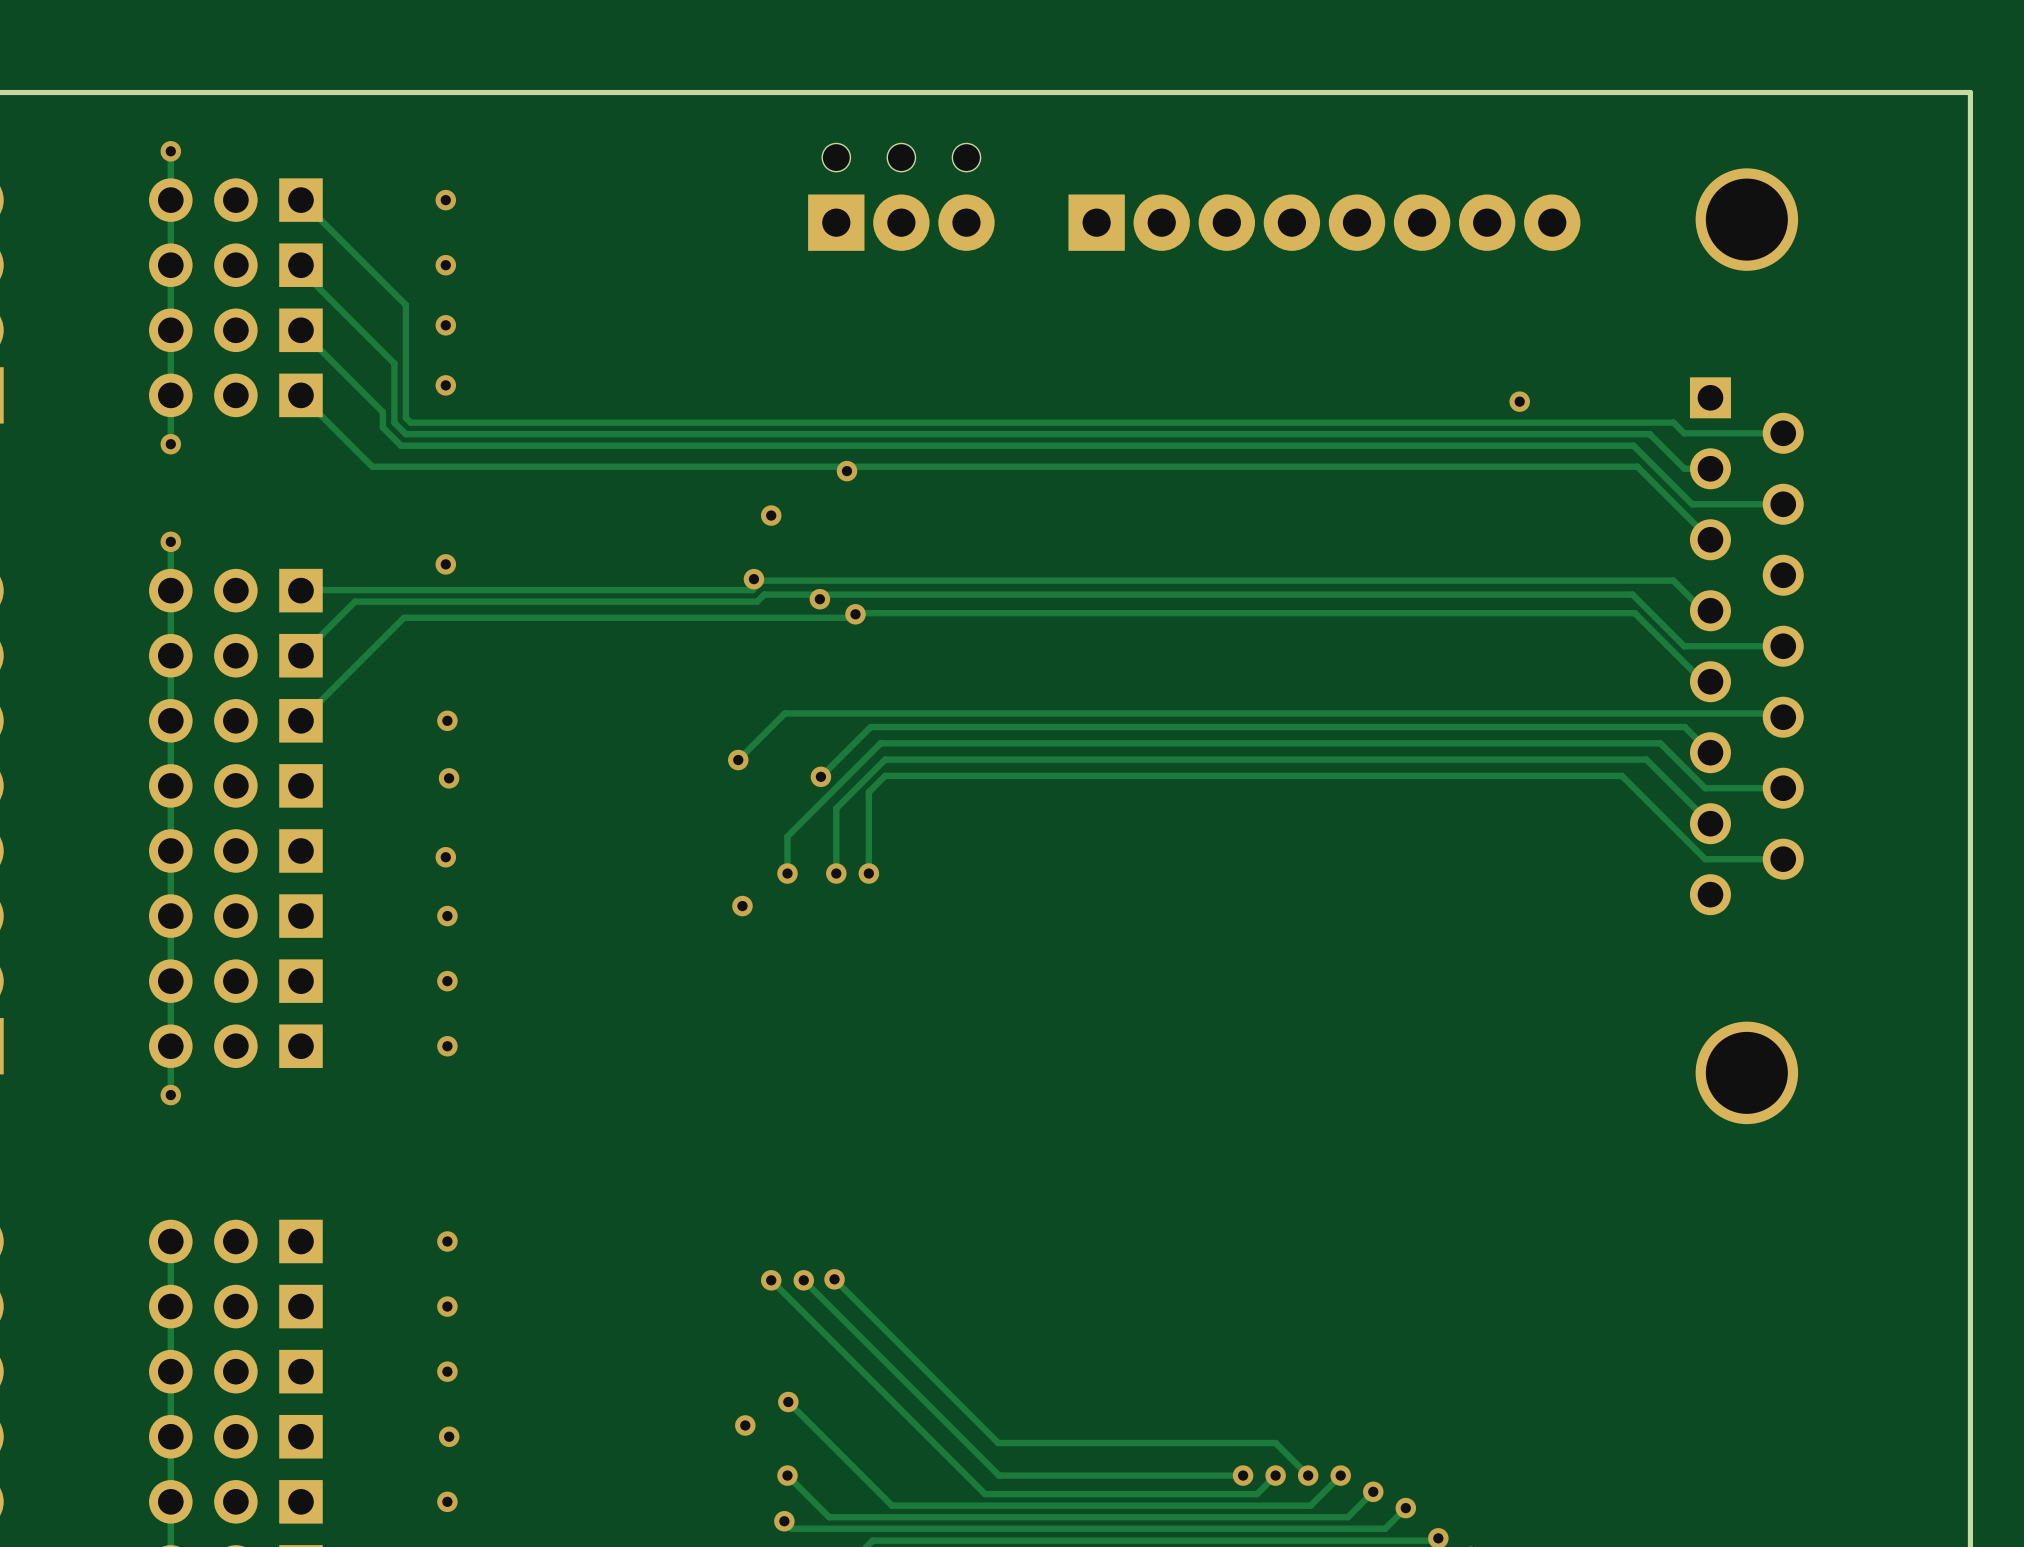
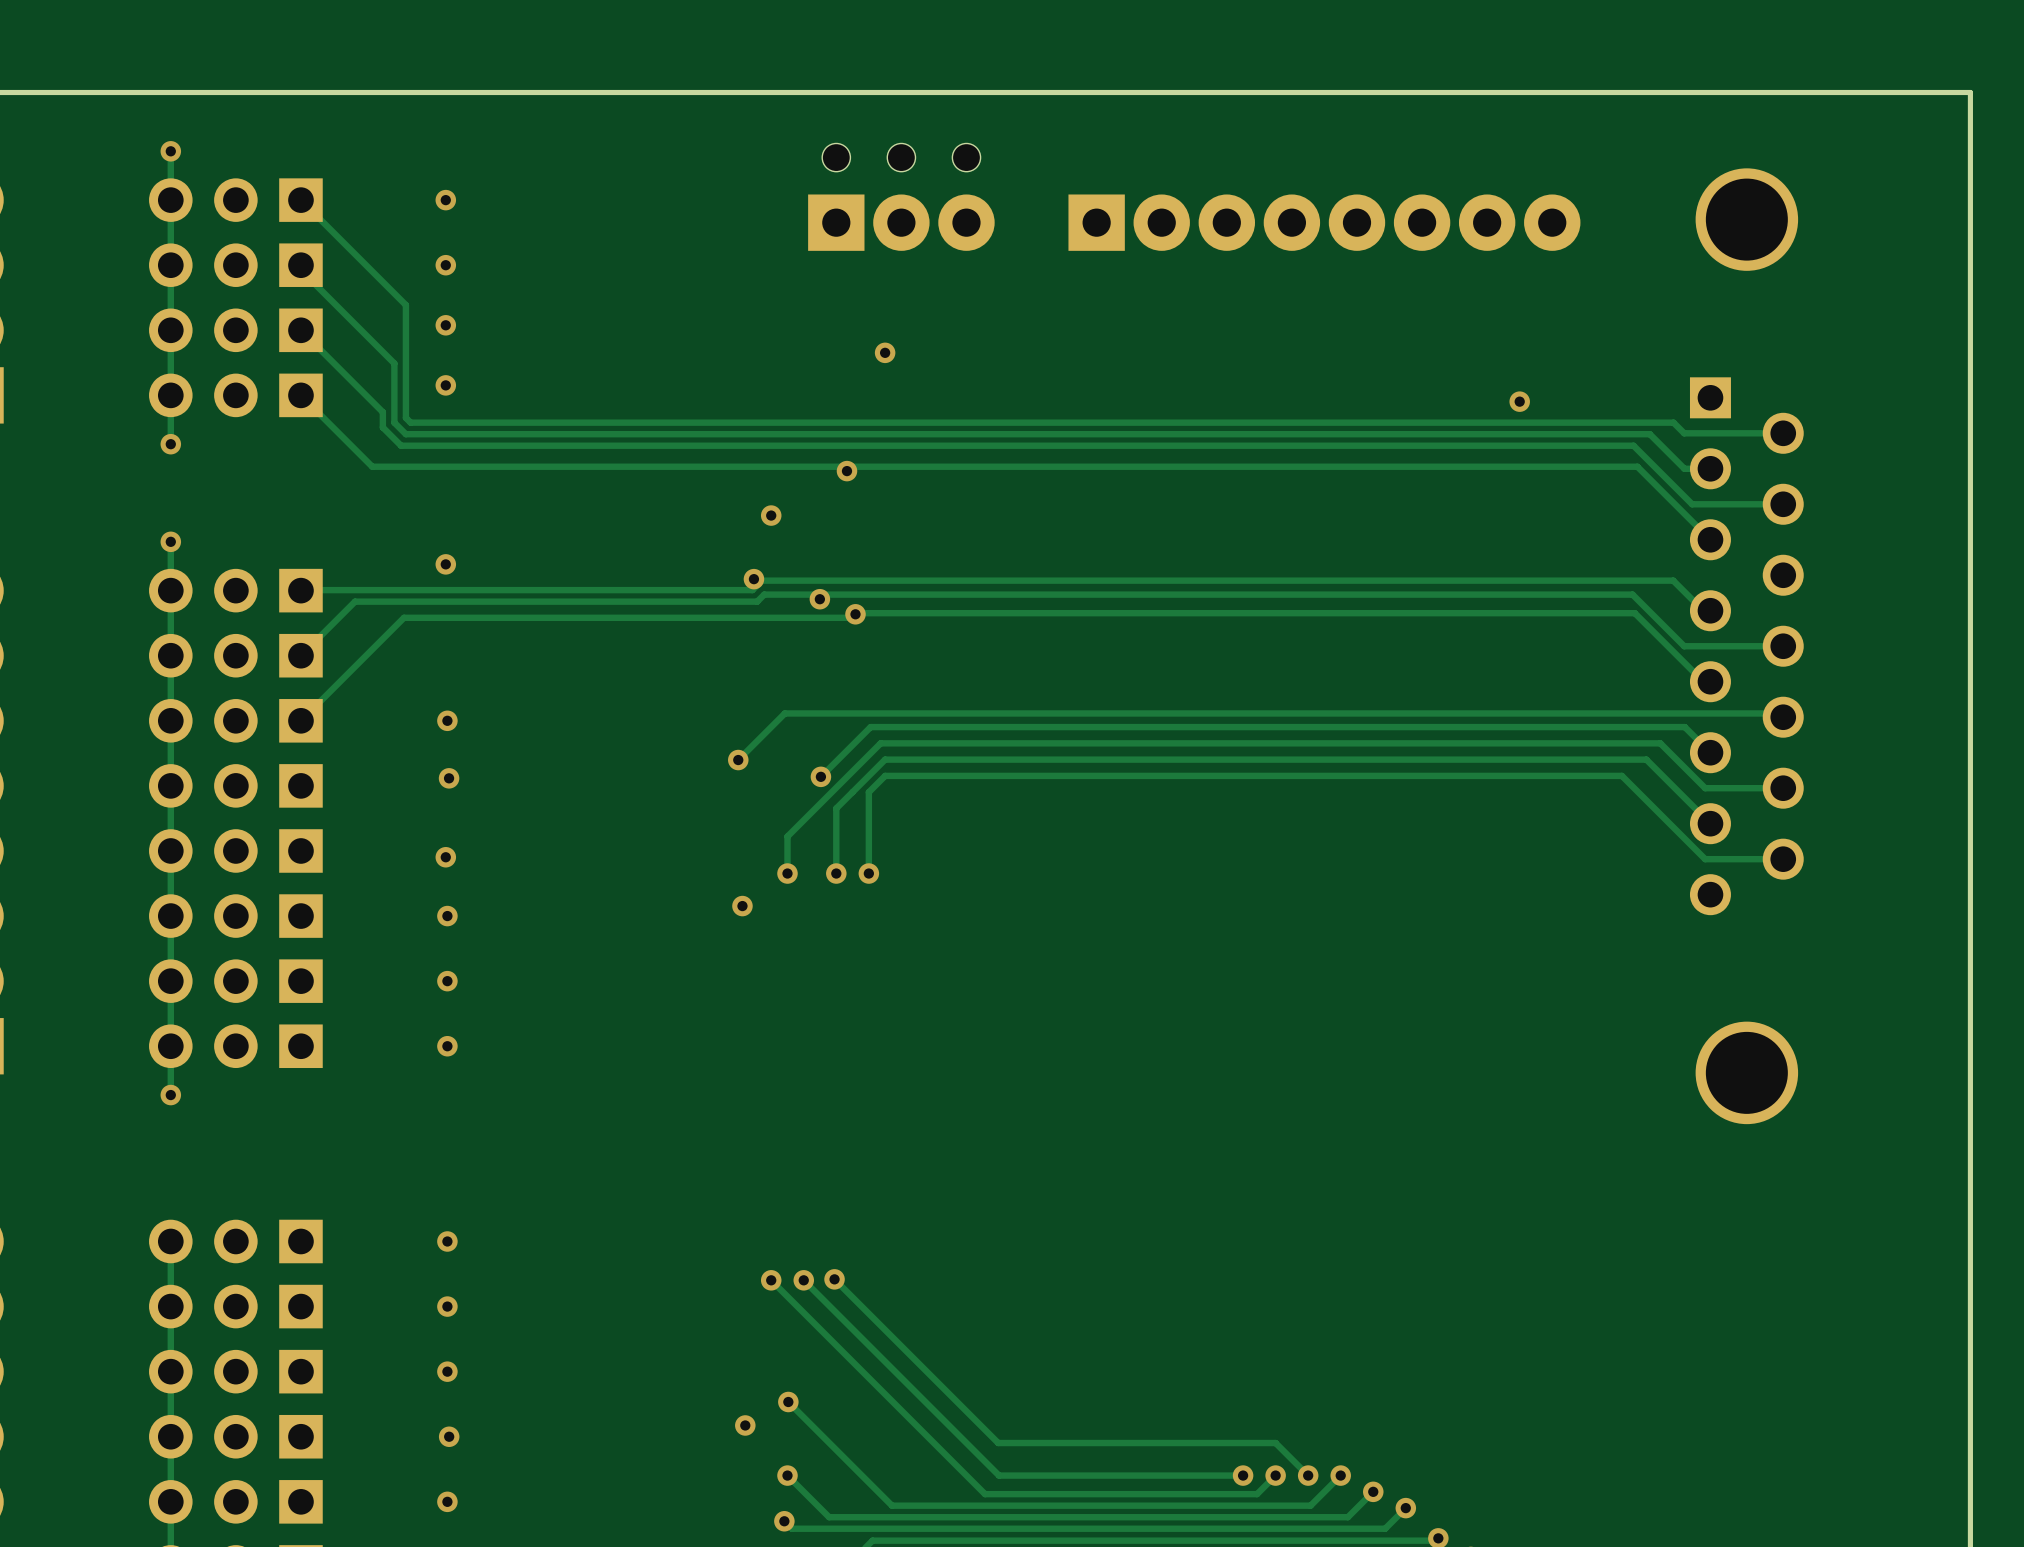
via: none -> (885, 352)

